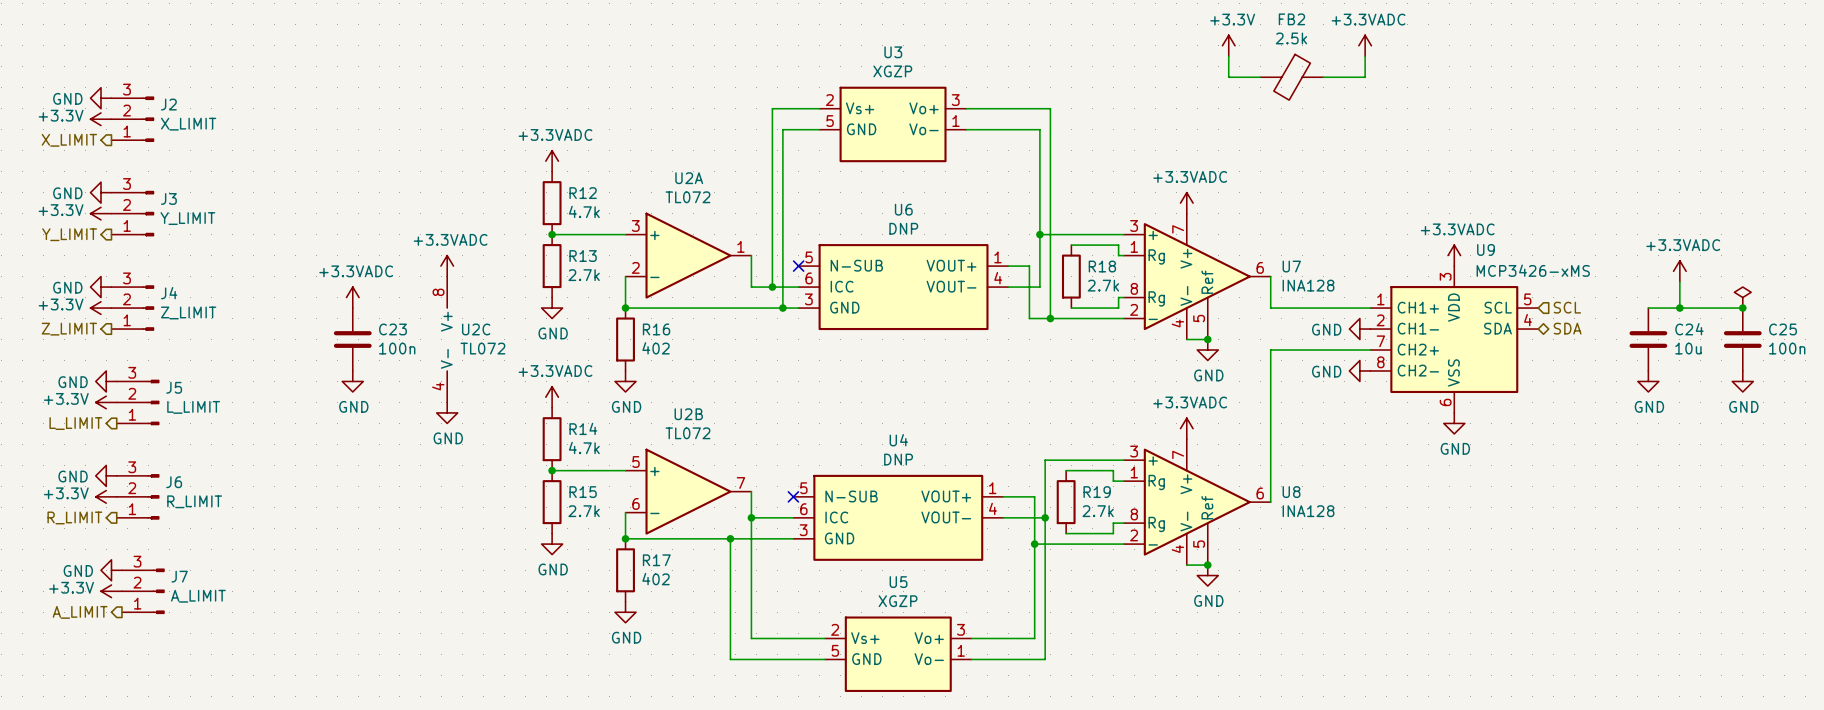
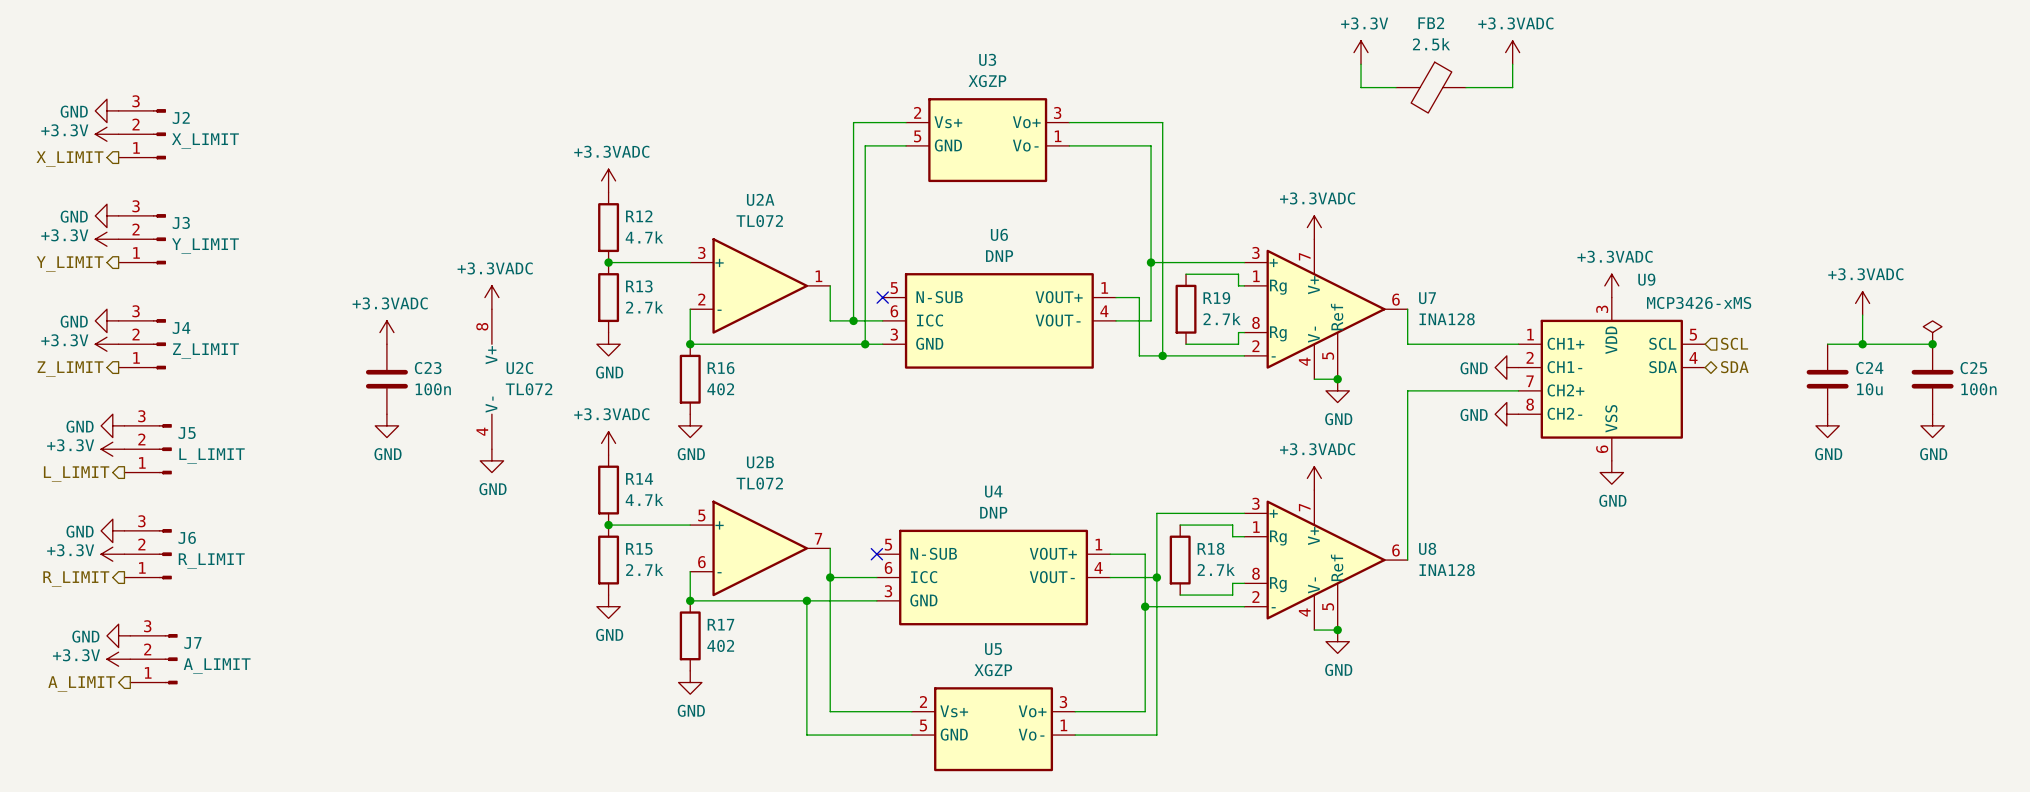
R18 name: R18 (1102, 266) -> R19 (1216, 298)
R19 name: R19 (1097, 492) -> R18 (1211, 548)

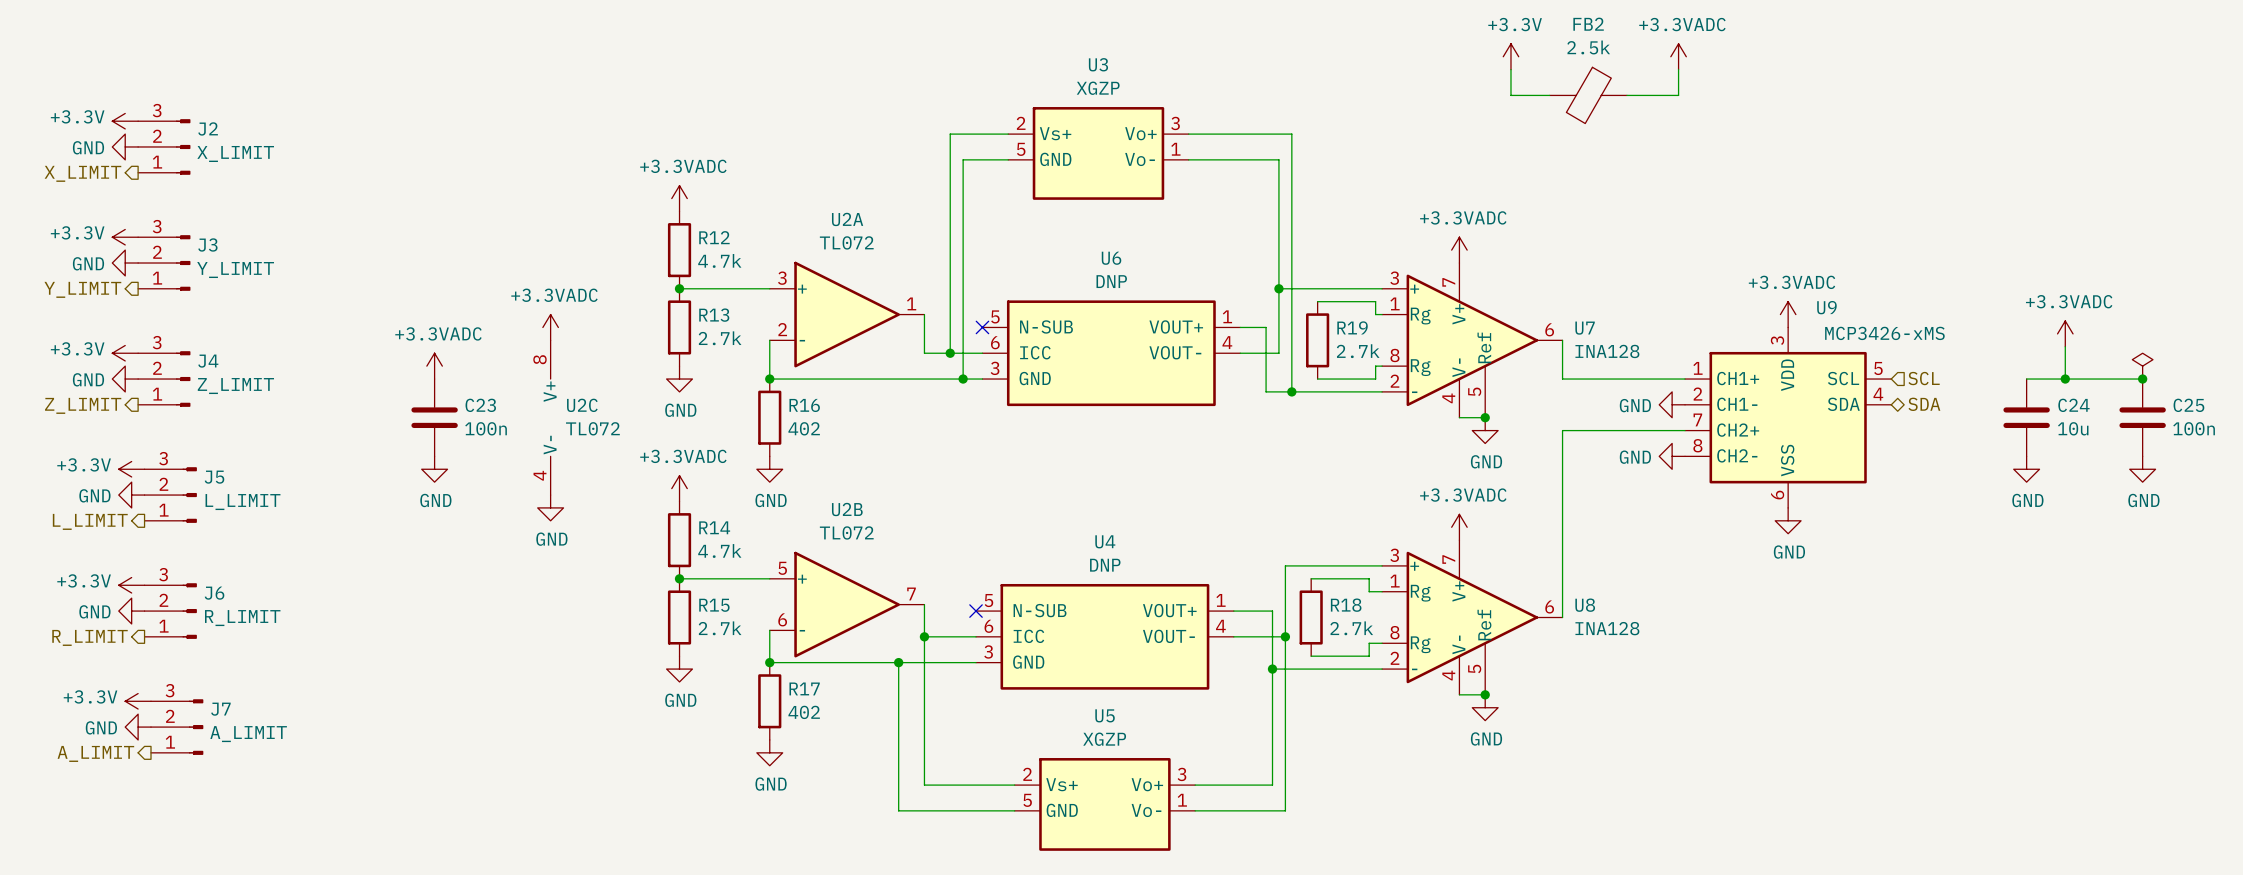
power symbol: GND (106, 110) -> +3.3V (125, 121)
power symbol: +3.3V (106, 134) -> GND (125, 146)
power symbol: GND (106, 215) -> +3.3V (125, 237)
power symbol: +3.3V (106, 239) -> GND (125, 263)
power symbol: GND (106, 320) -> +3.3V (125, 353)
power symbol: +3.3V (106, 344) -> GND (125, 379)
power symbol: GND (112, 425) -> +3.3V (131, 469)
power symbol: +3.3V (112, 449) -> GND (131, 495)
power symbol: GND (112, 530) -> +3.3V (131, 585)
power symbol: +3.3V (112, 554) -> GND (131, 611)
power symbol: GND (118, 635) -> +3.3V (138, 701)
power symbol: +3.3V (118, 659) -> GND (138, 727)

